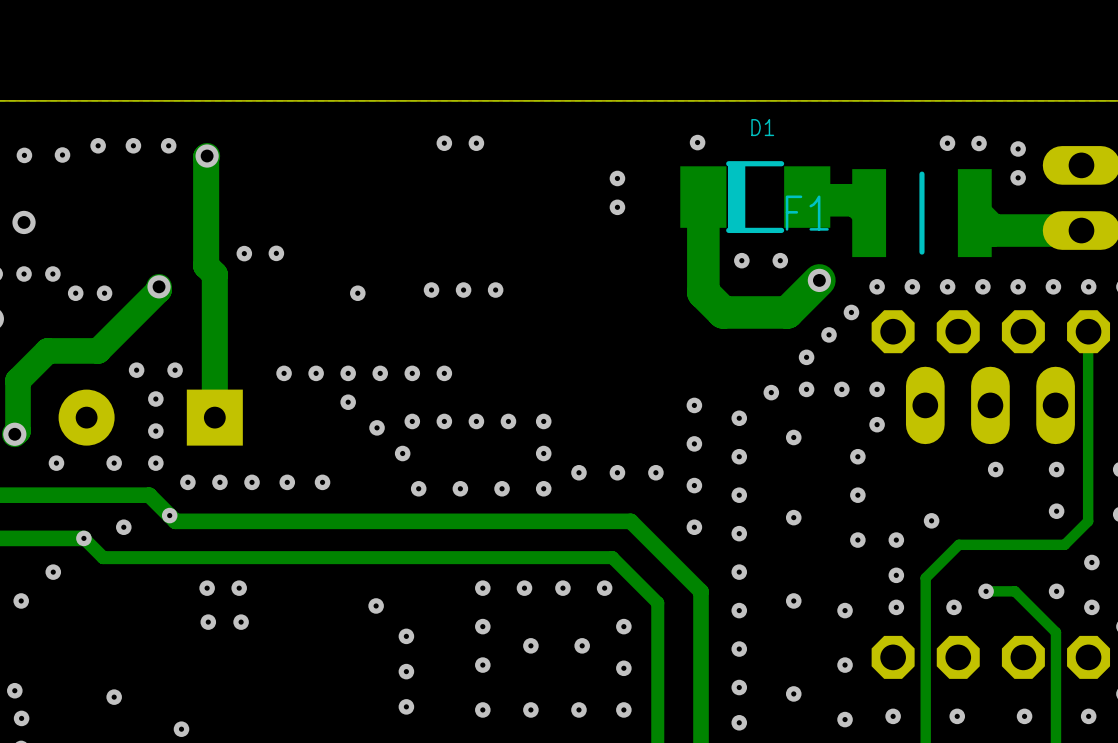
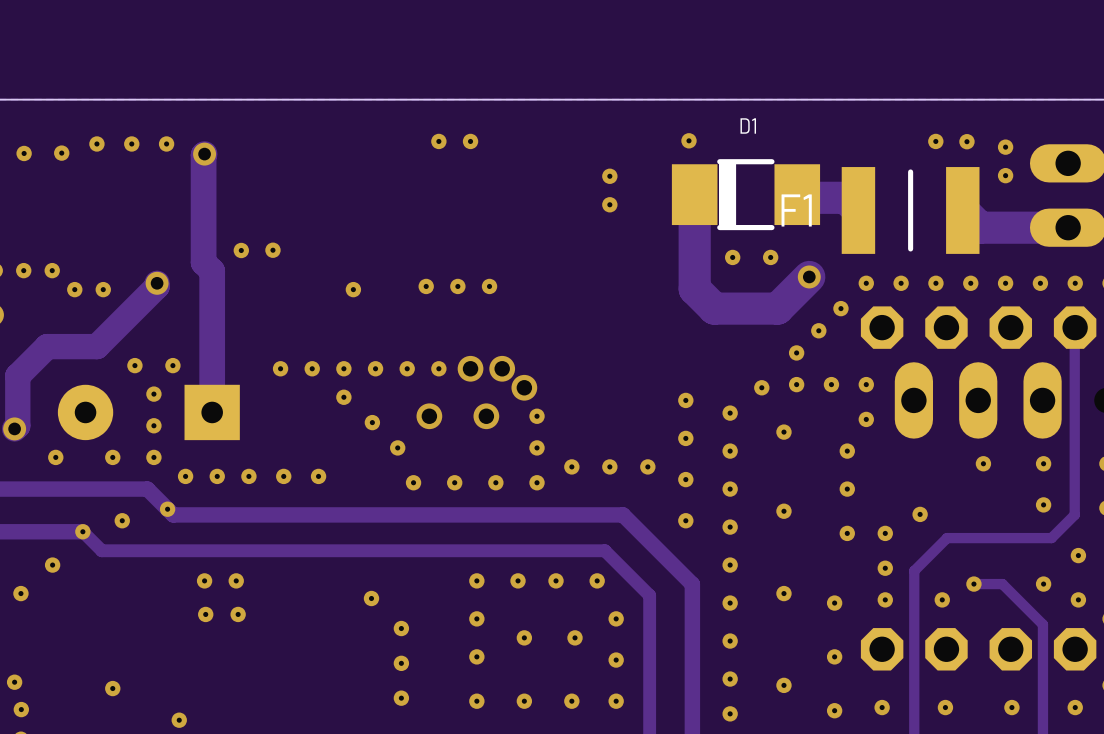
via: (24, 222) -> none
via: none -> (470, 368)
via: none -> (502, 368)
via: none -> (524, 387)
via size: [436, 413, 453, 430] -> [416, 403, 443, 430]
via: (412, 421) -> none
via: (476, 421) -> none
via: none -> (486, 416)
via: (508, 421) -> none

